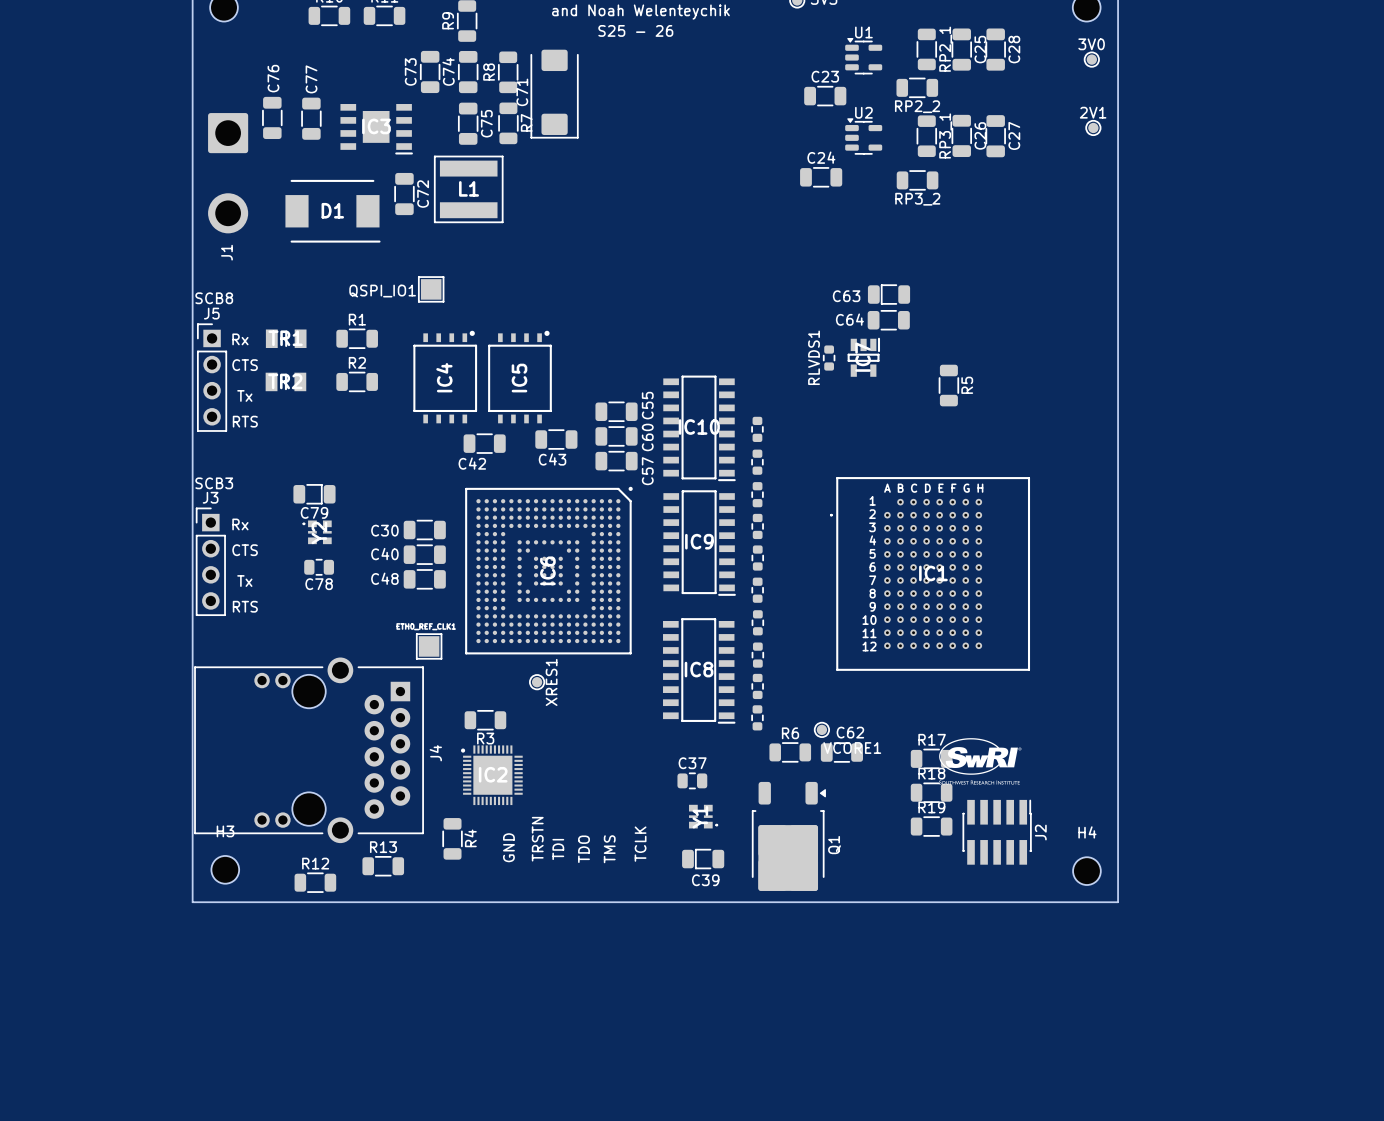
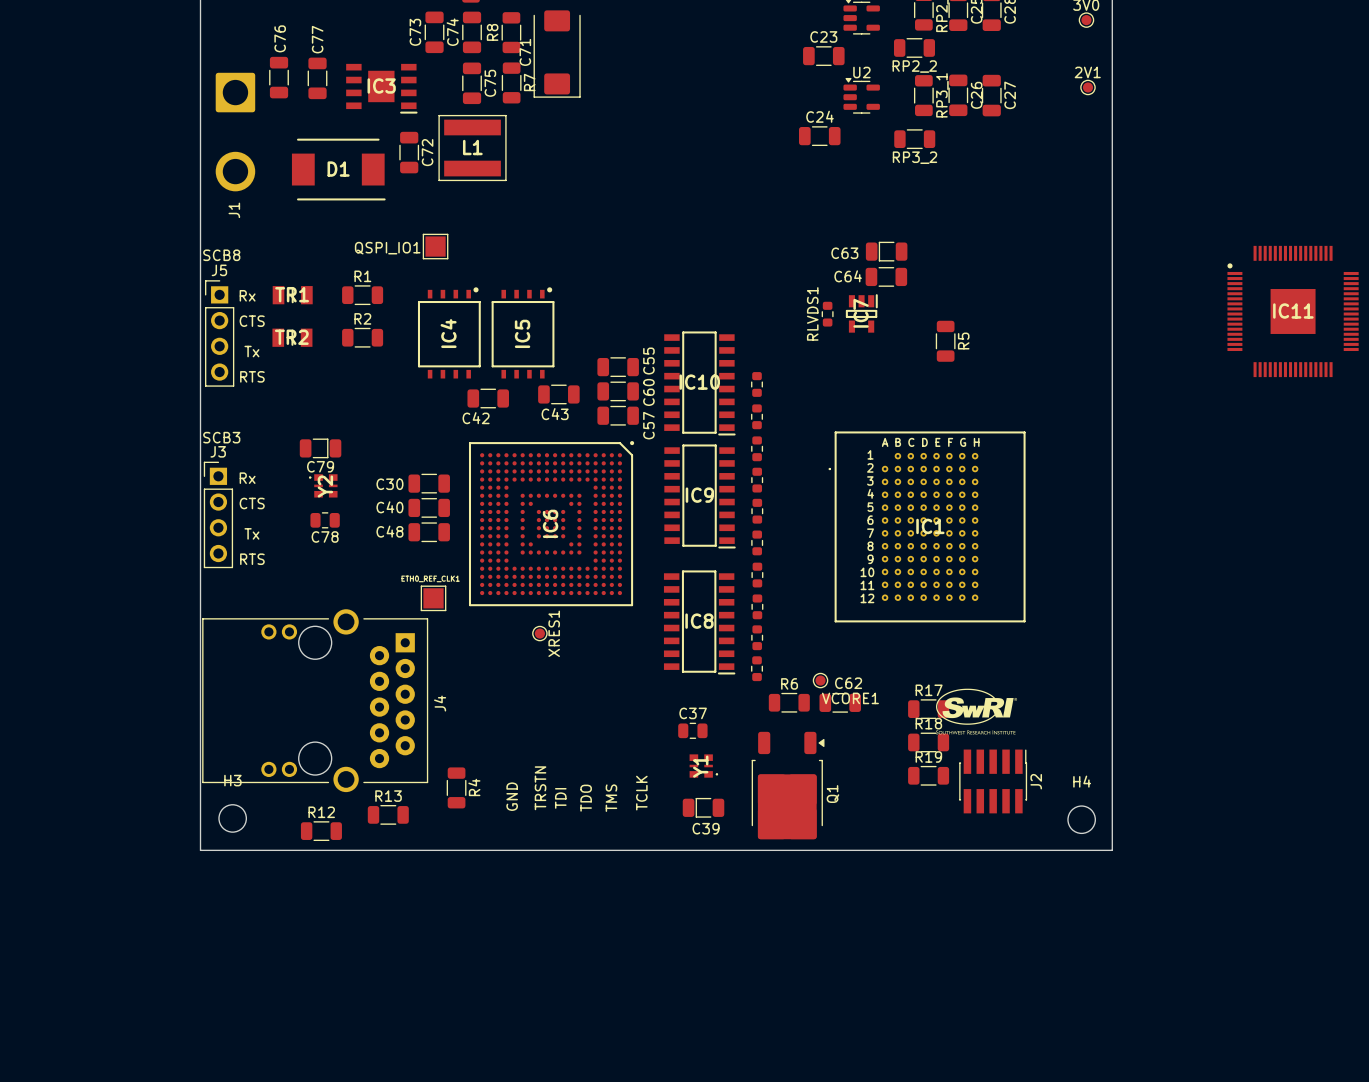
IC11: none -> (1293, 311)
R3: (485, 720) -> none
part: (491, 775) -> none

